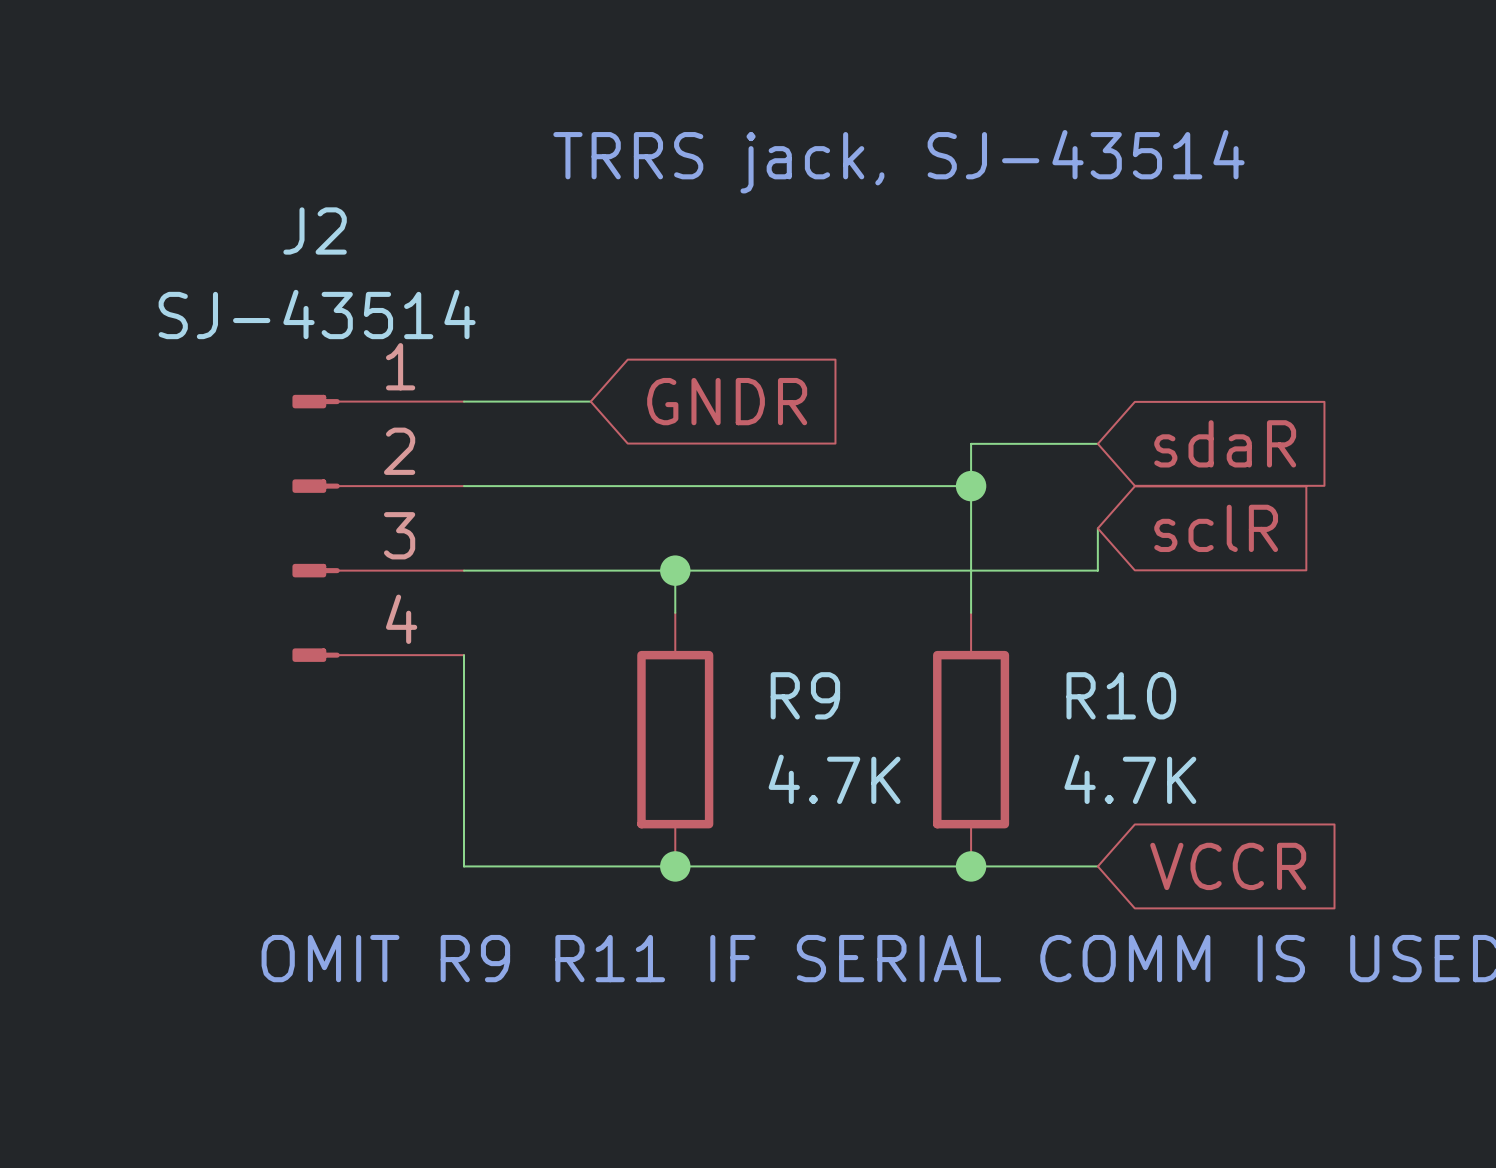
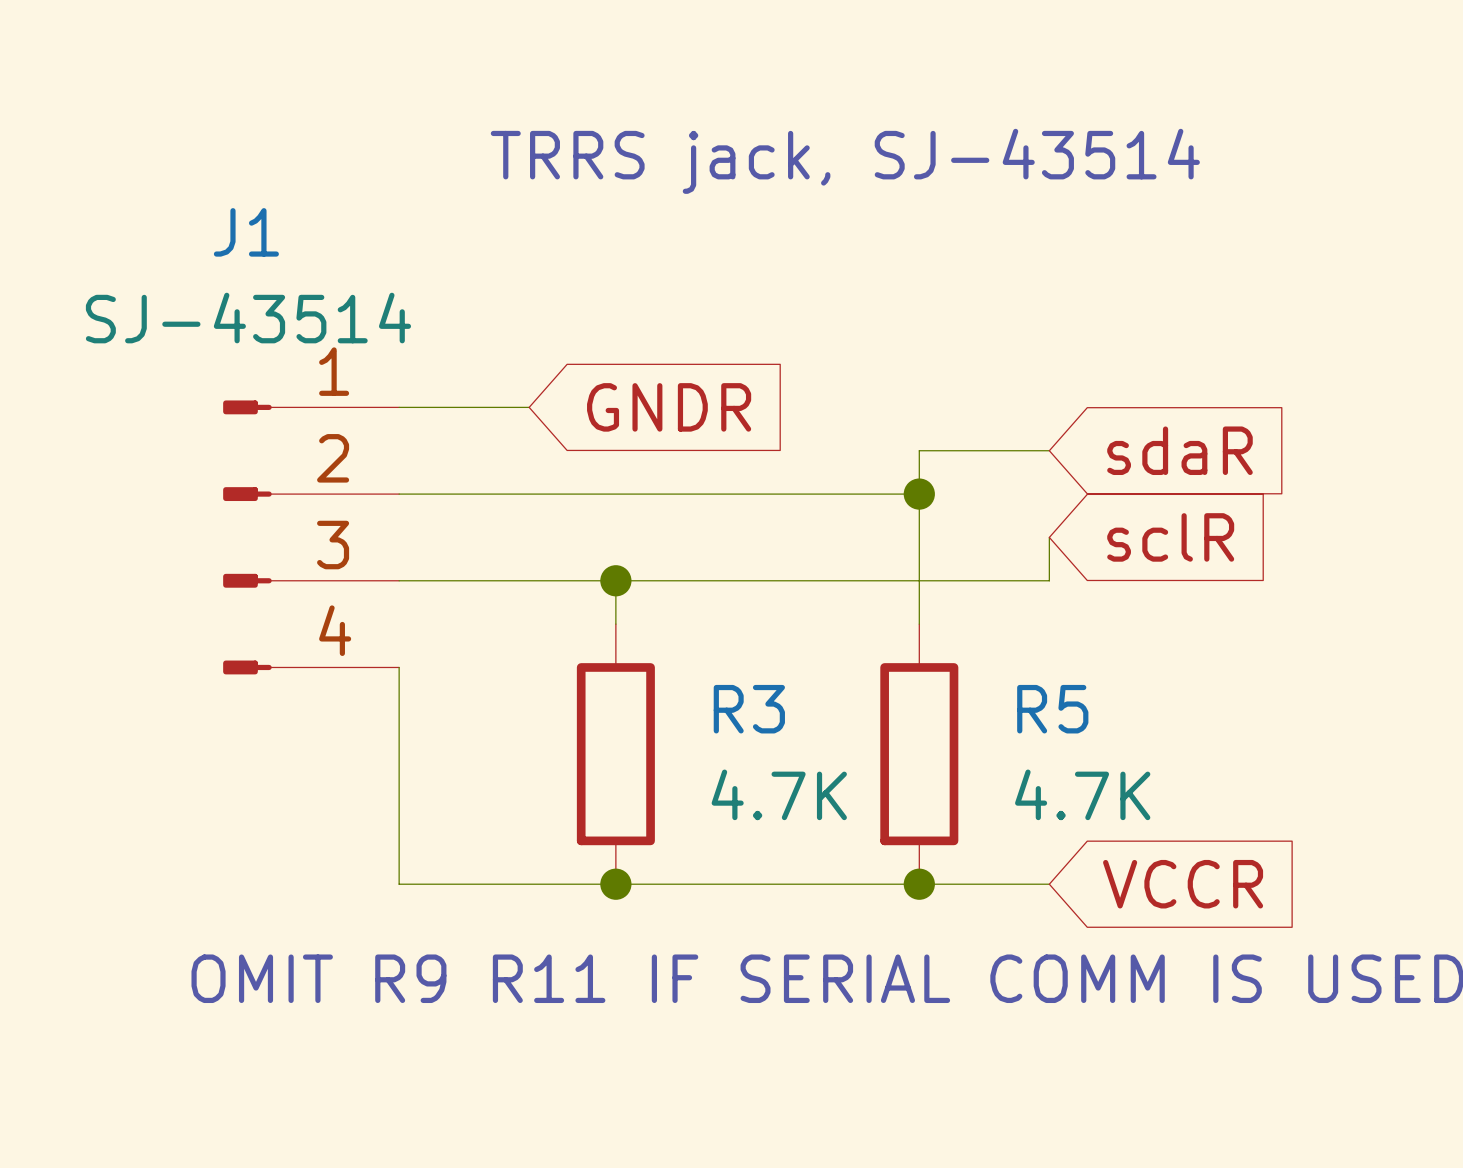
J2 name: J2 (315, 230) -> J1 (246, 232)
R9 name: R9 (805, 695) -> R3 (749, 709)
R10 name: R10 (1121, 695) -> R5 (1052, 709)

